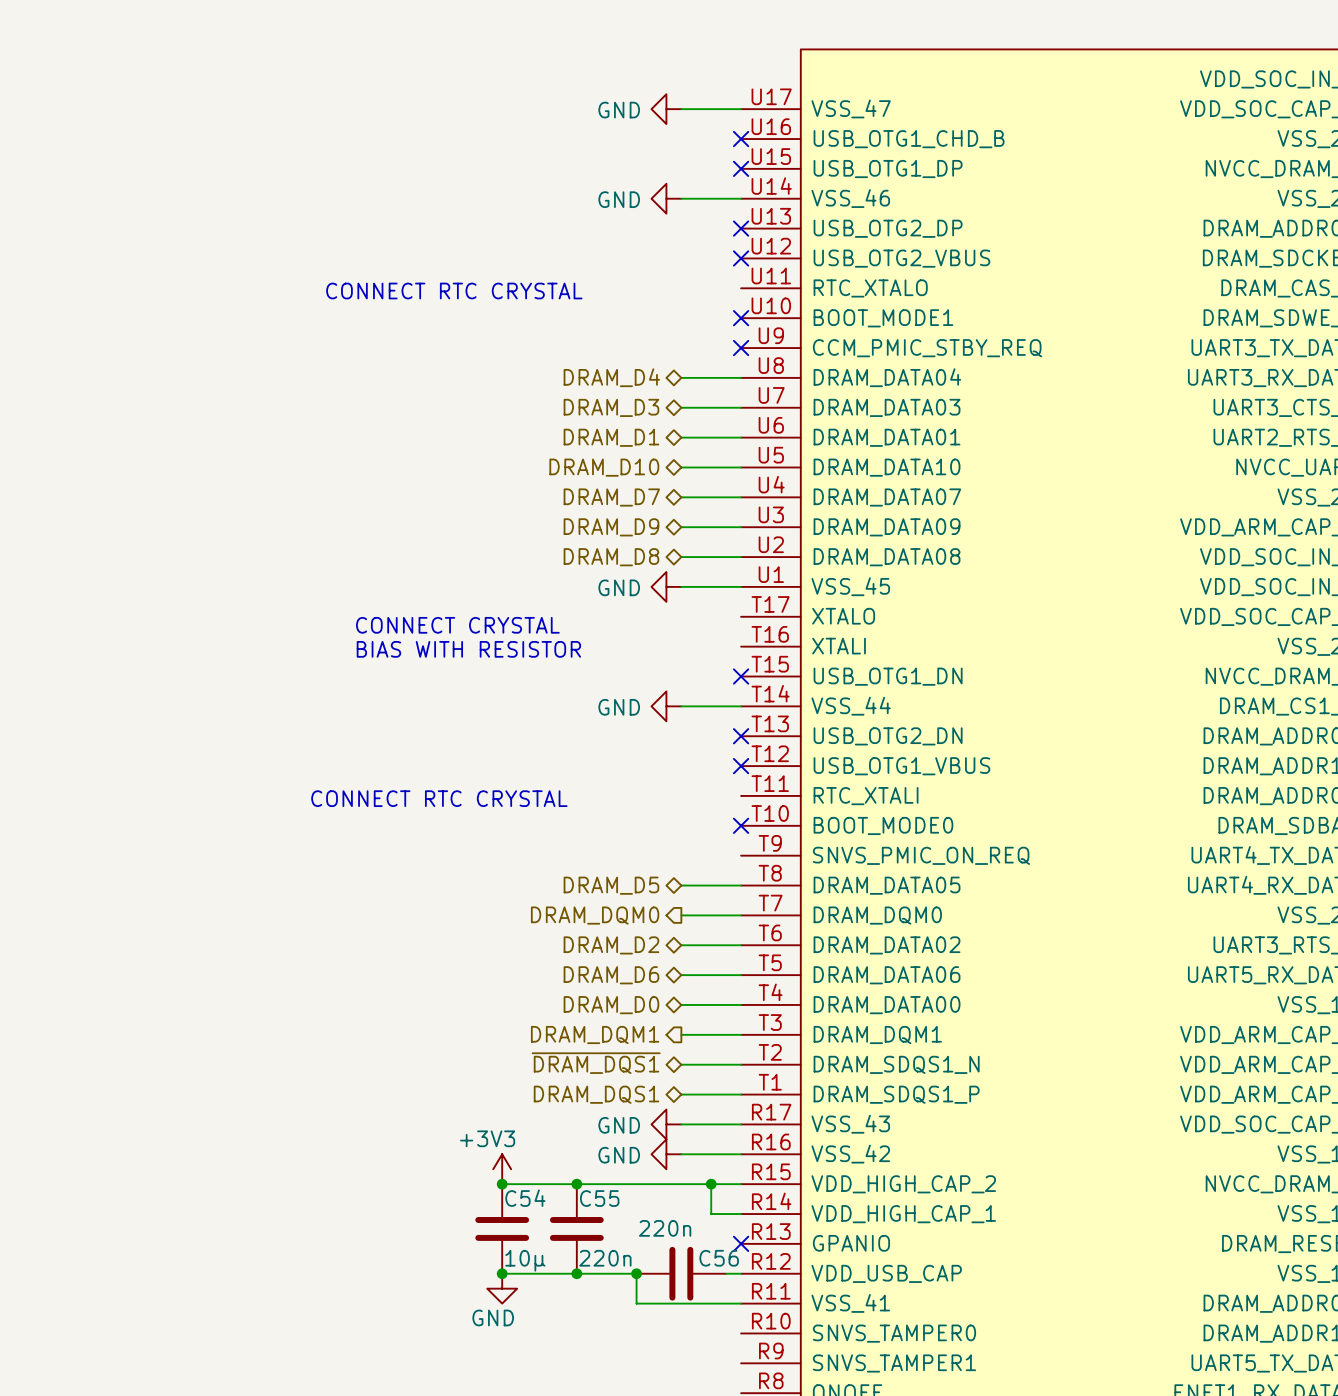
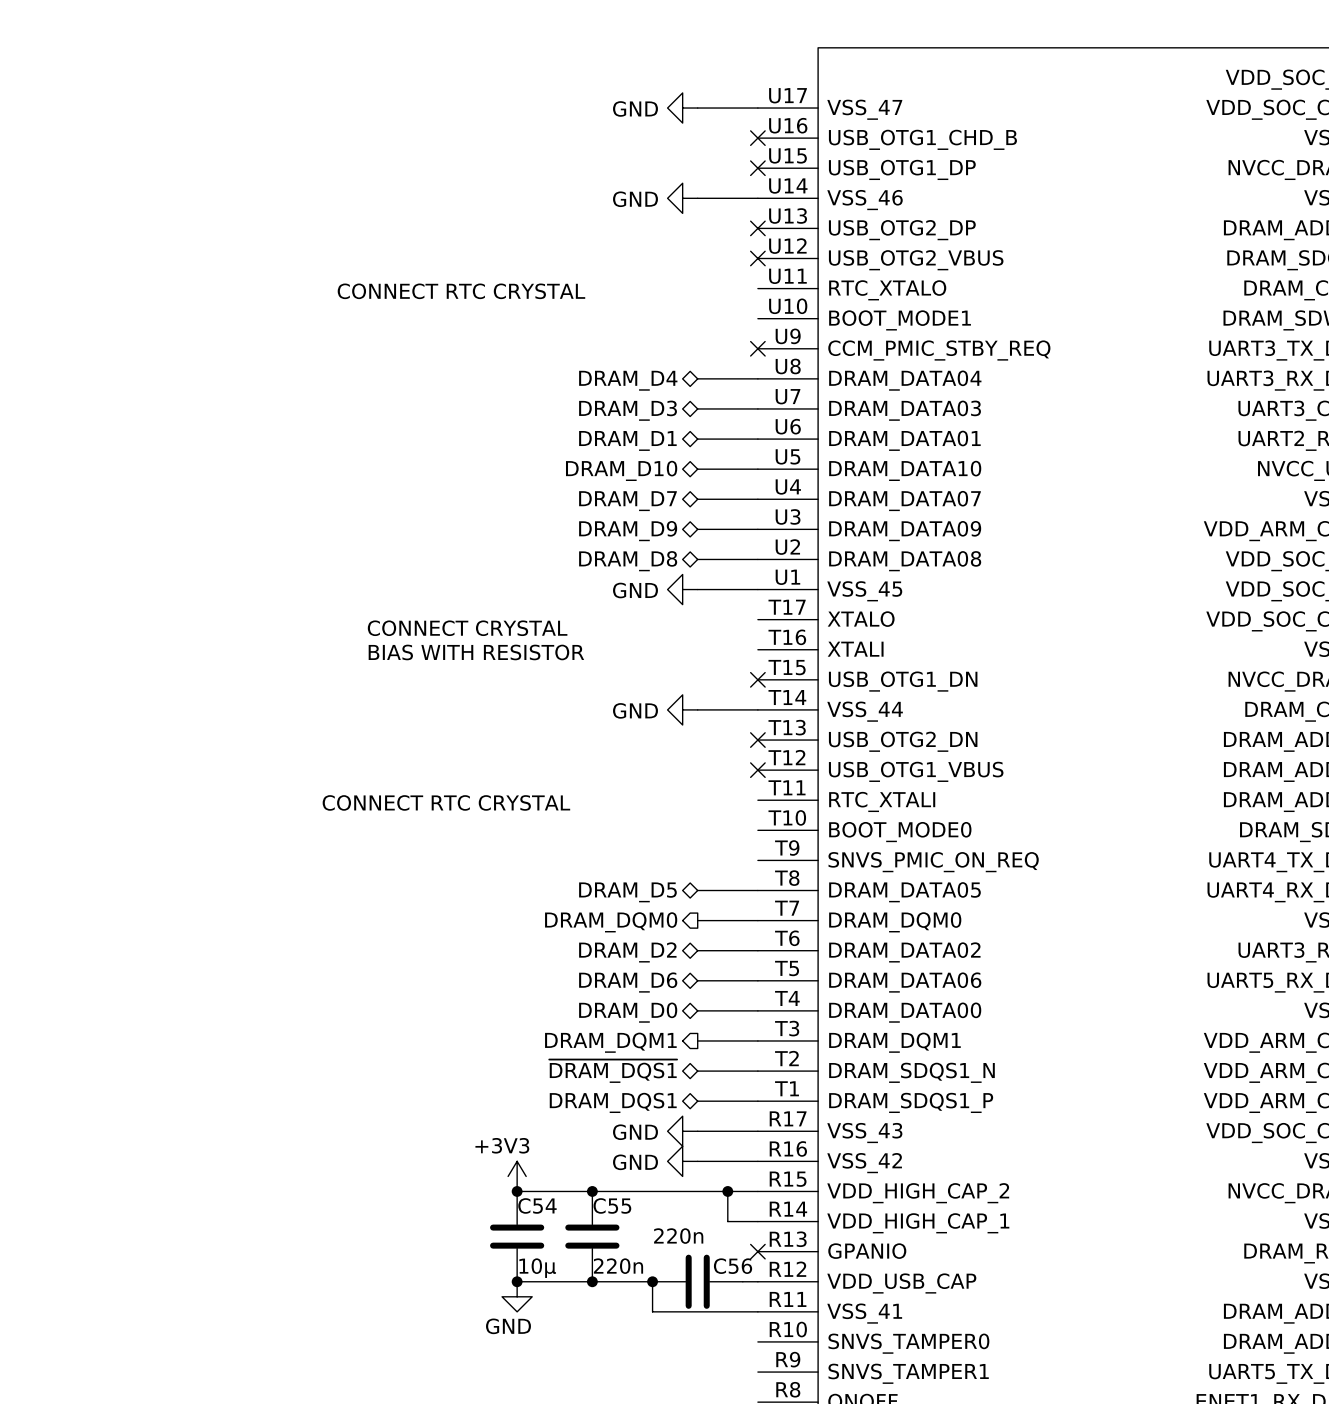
no-connect mark: (741, 318) -> none
no-connect mark: (741, 825) -> none

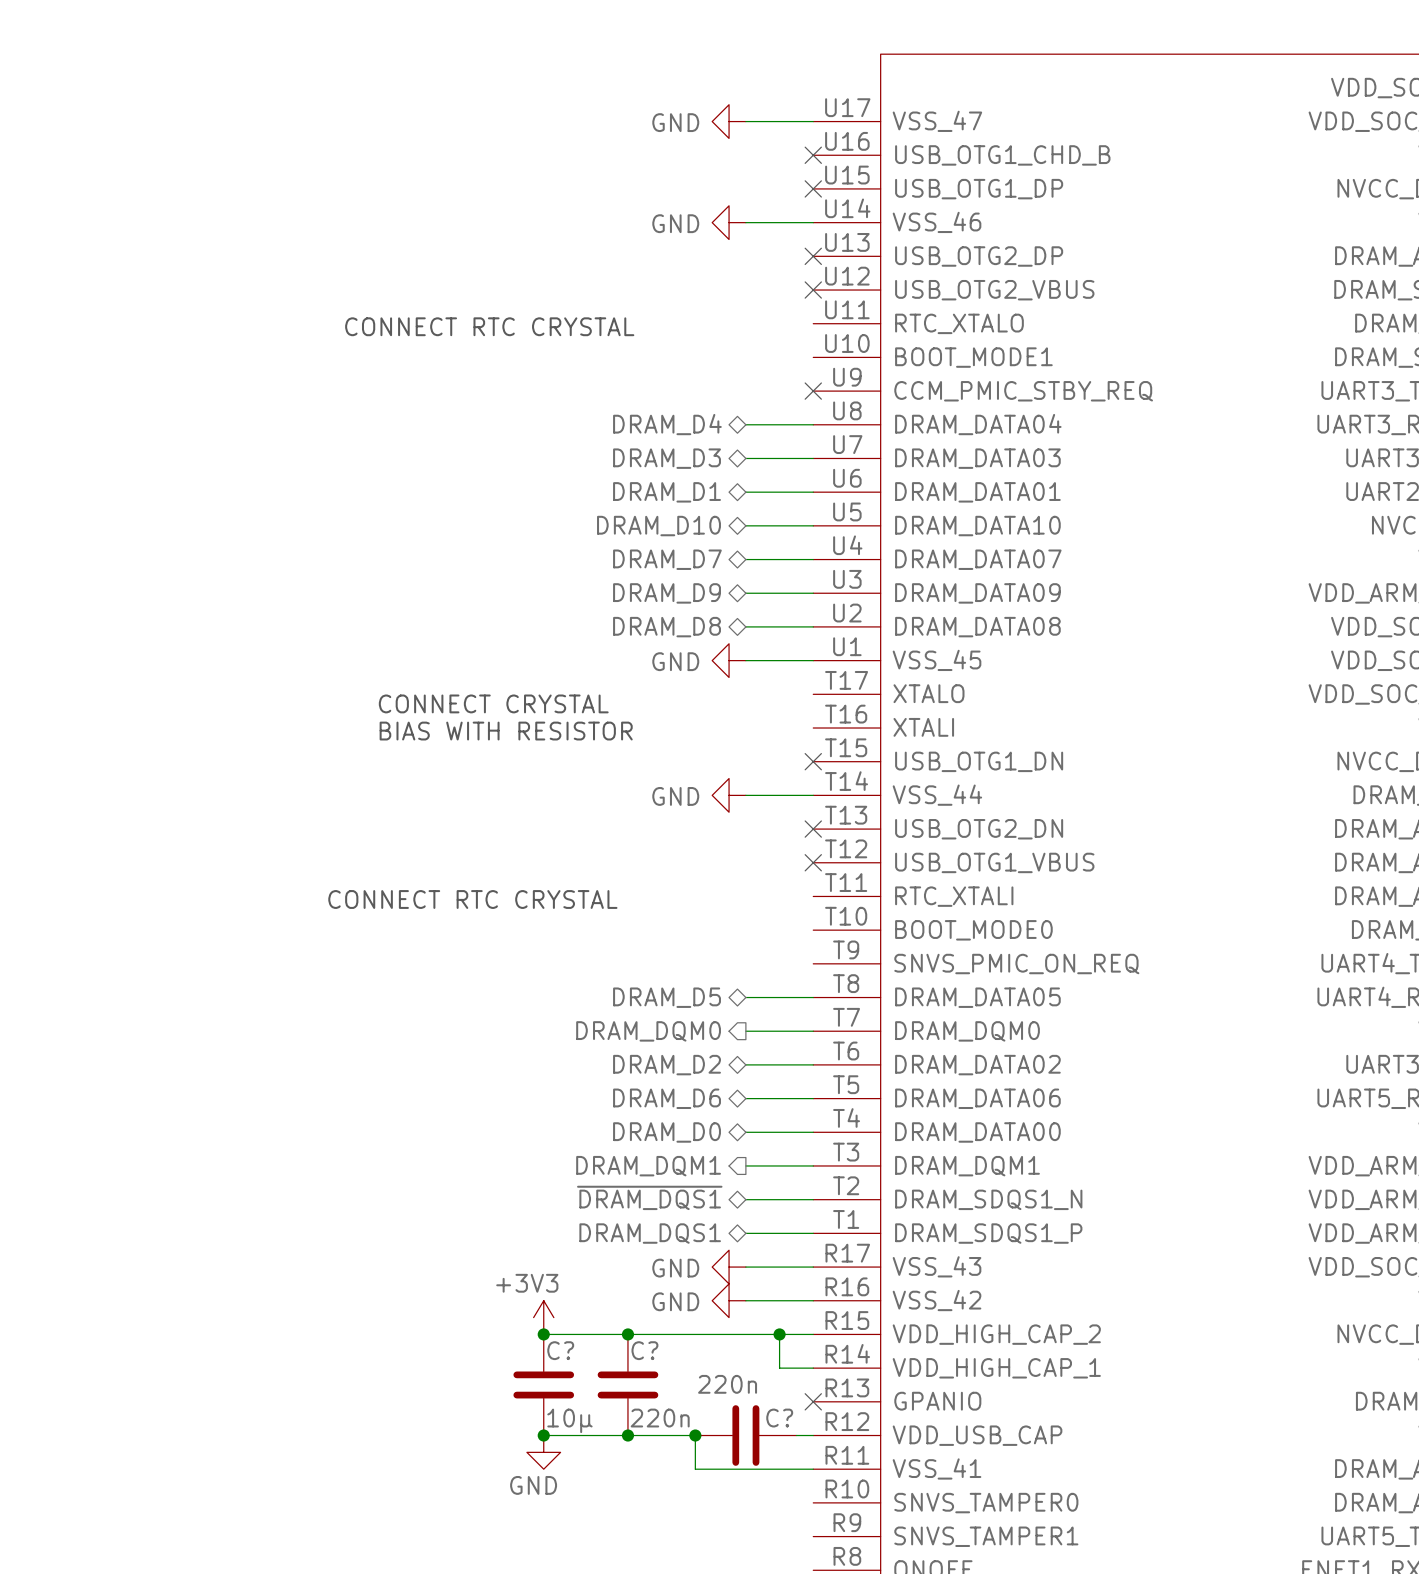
C54 name: C54 (537, 1205) -> C? (560, 1350)
C55 name: C55 (612, 1205) -> C? (644, 1350)
C56 name: C56 (733, 1266) -> C? (779, 1418)

